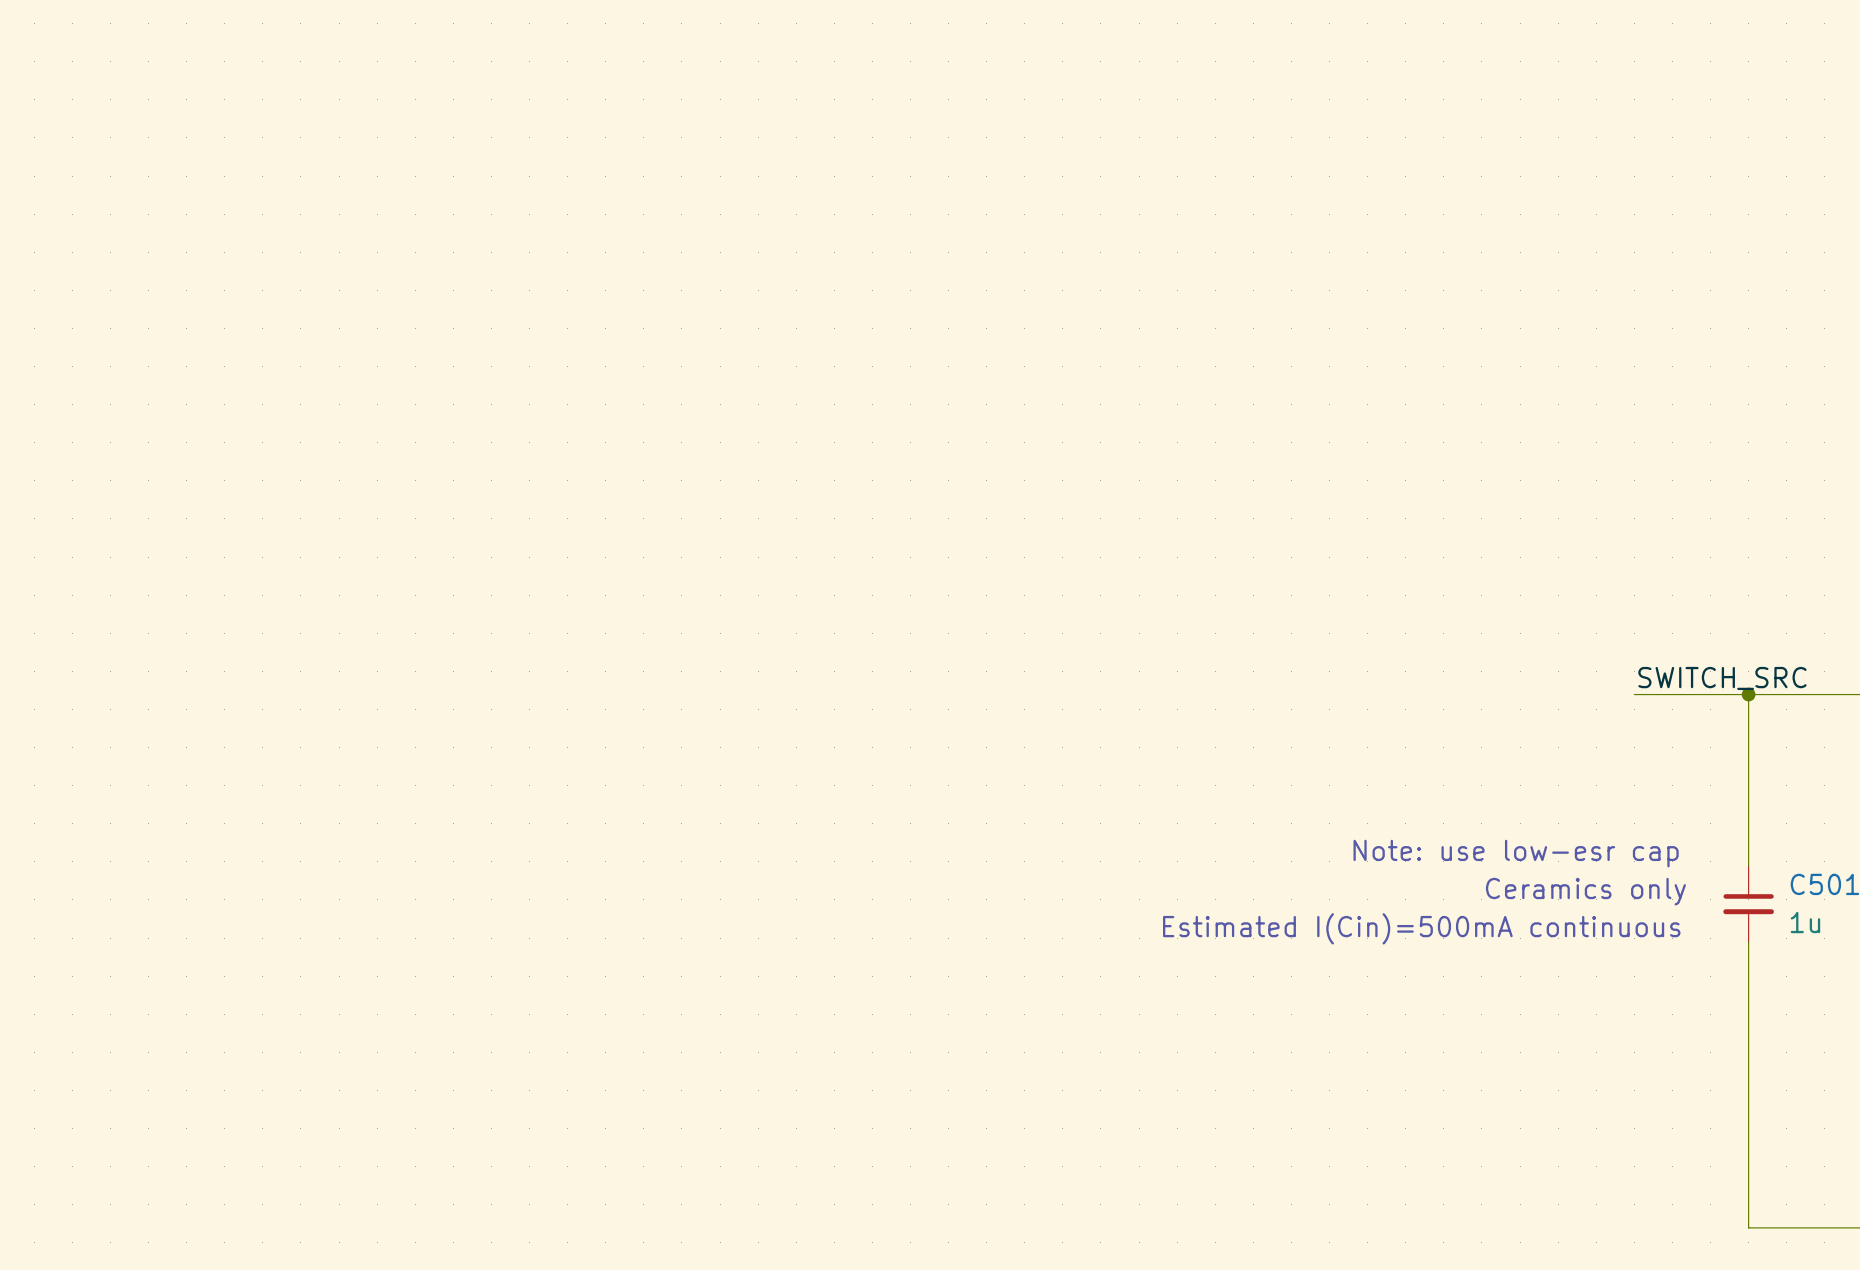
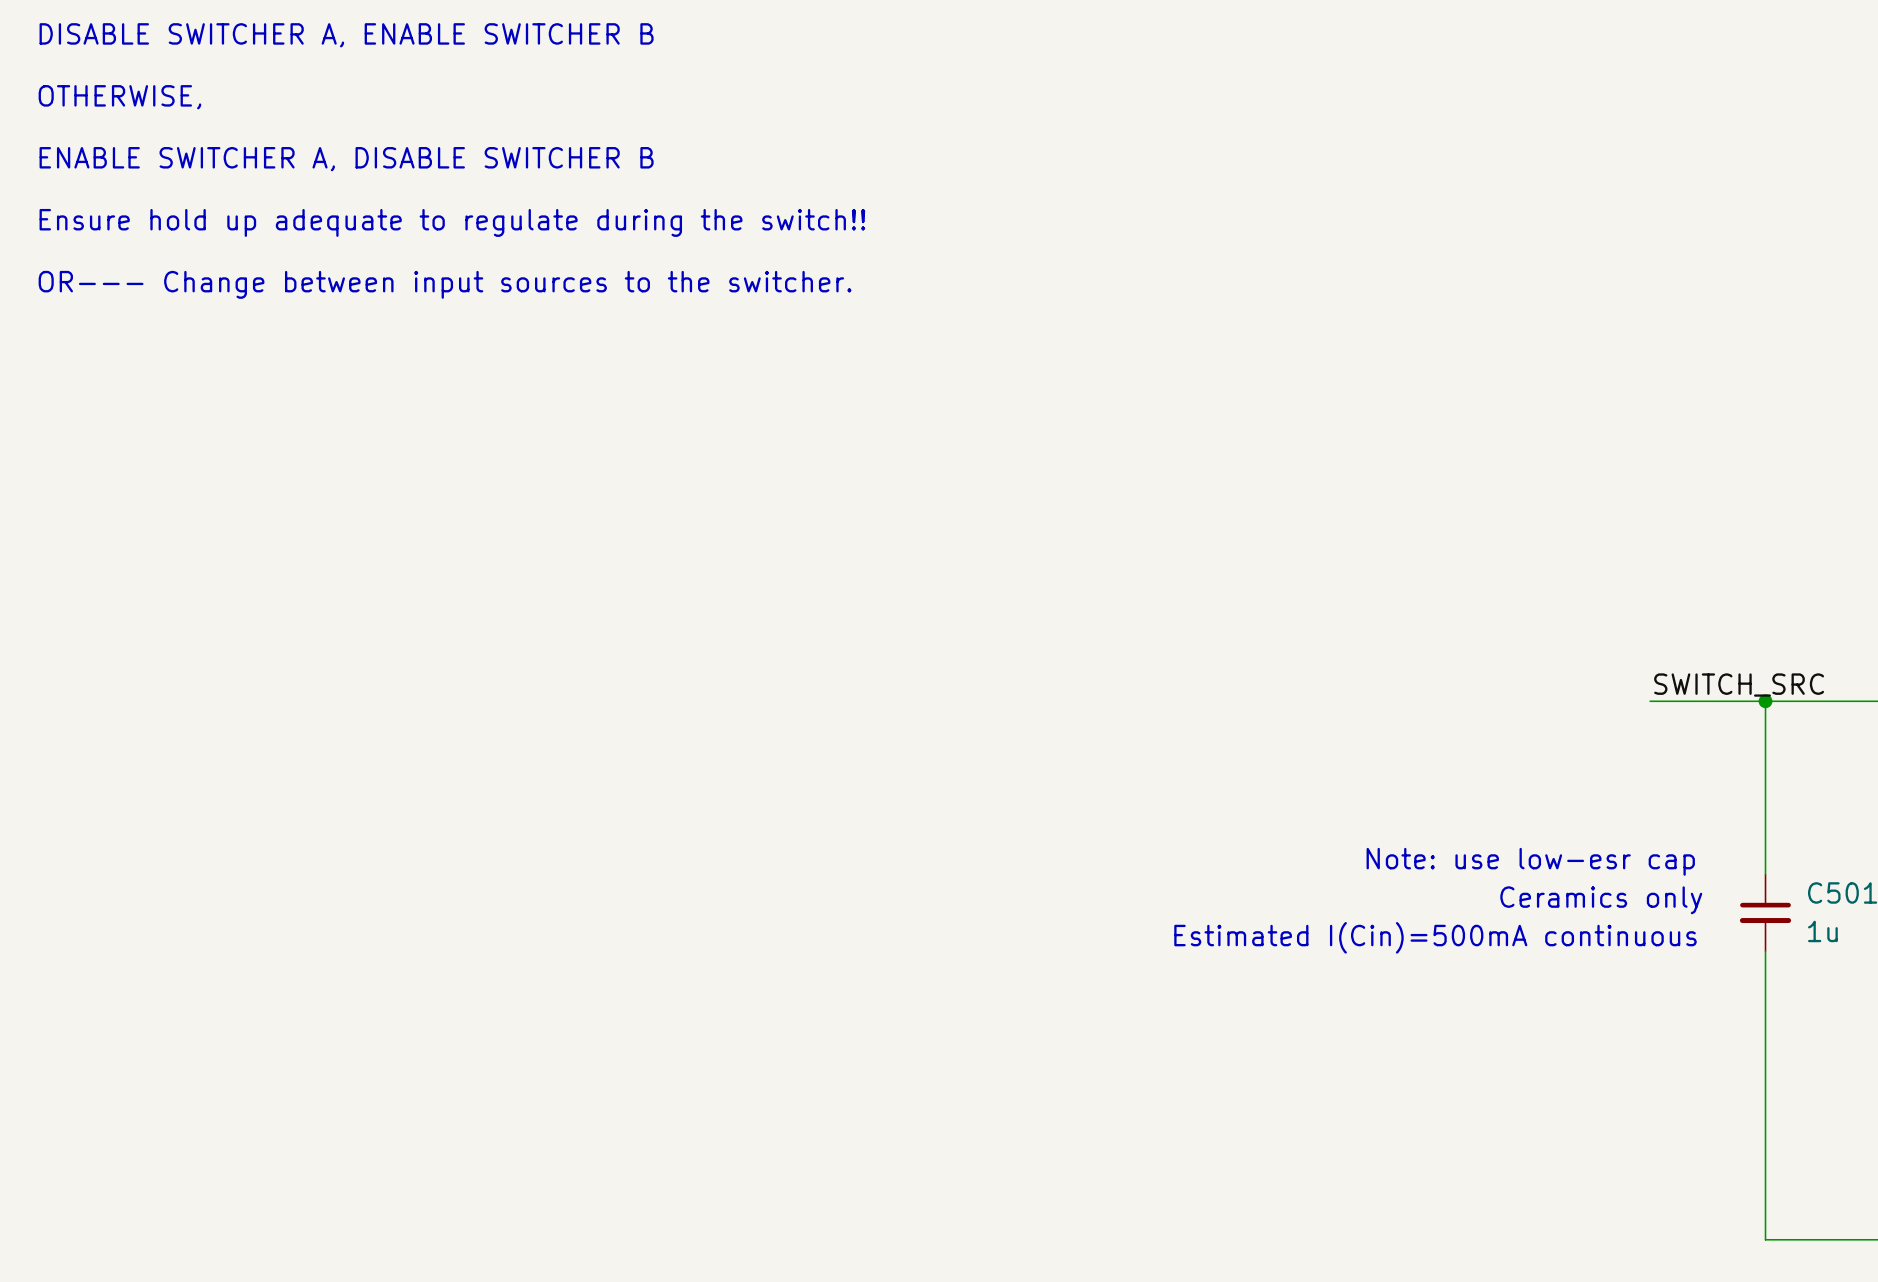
text: none -> DISABLE SWITCHER A, ENABLE SWITCHER B (346, 35)
text: none -> OTHERWISE, (119, 97)
text: none -> ENABLE SWITCHER A, DISABLE SWITCHER B (346, 159)
text: none -> Ensure hold up adequate to regulate during the switch!! (452, 222)
text: none -> OR--- Change between input sources to the switcher. (445, 284)

